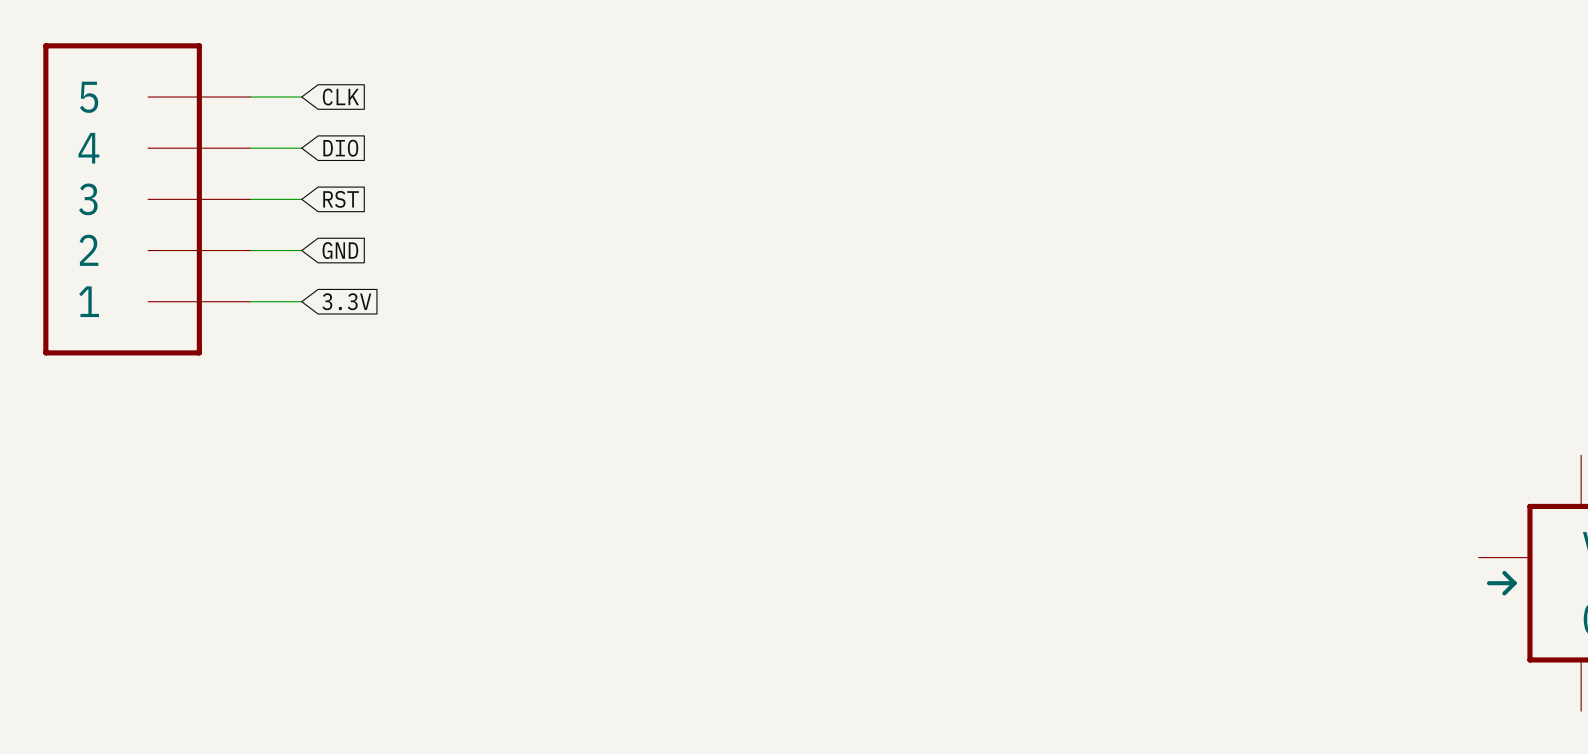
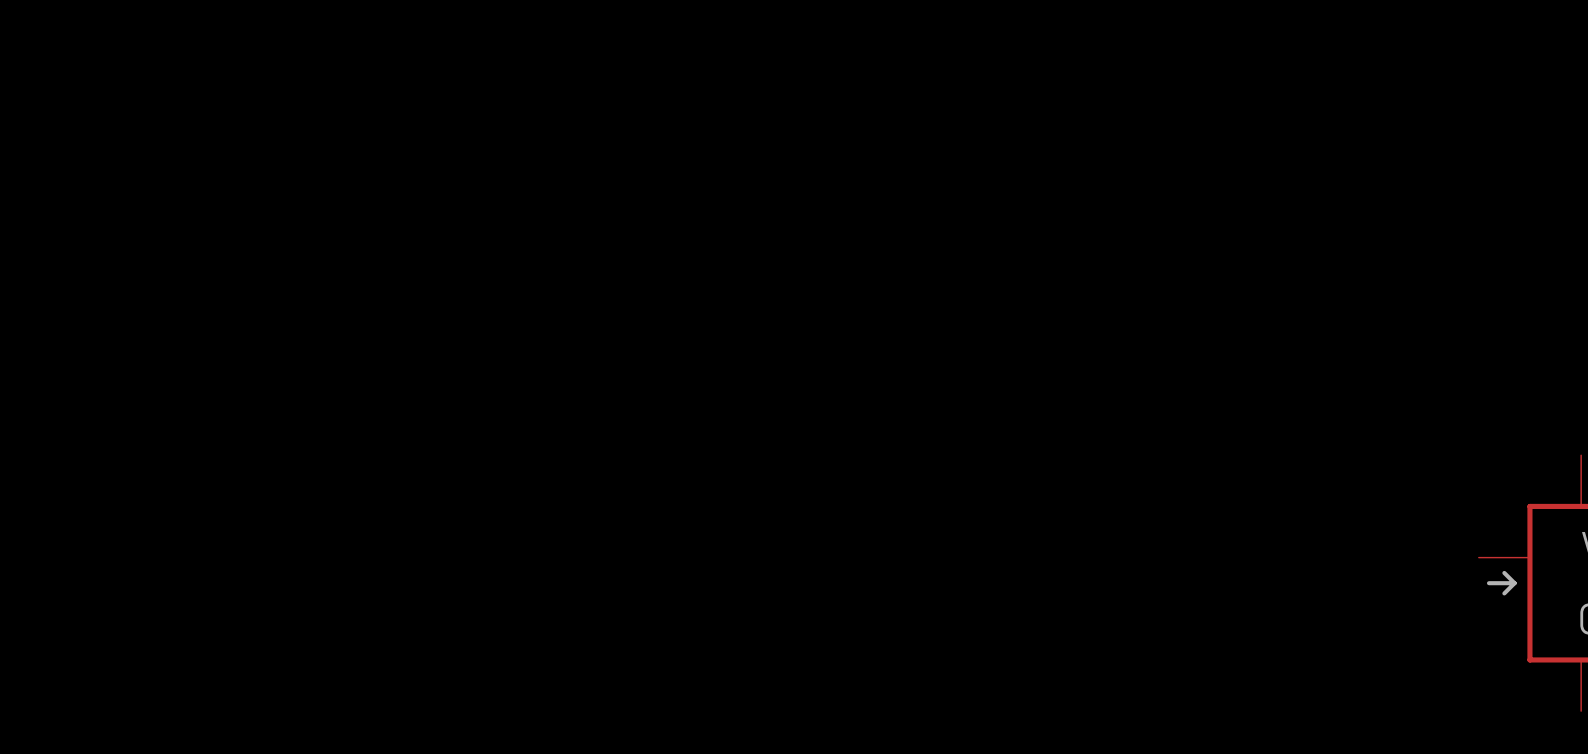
wire: (250, 97) (301, 97) -> none
global label: CLK (340, 97) -> none
wire: (250, 148) (301, 148) -> none
global label: DIO (340, 148) -> none
part: (146, 199) -> none
wire: (250, 199) (301, 199) -> none
global label: RST (341, 199) -> none
wire: (250, 250) (301, 250) -> none
global label: GND (340, 250) -> none
wire: (250, 301) (301, 301) -> none
global label: 3.3V (346, 301) -> none

